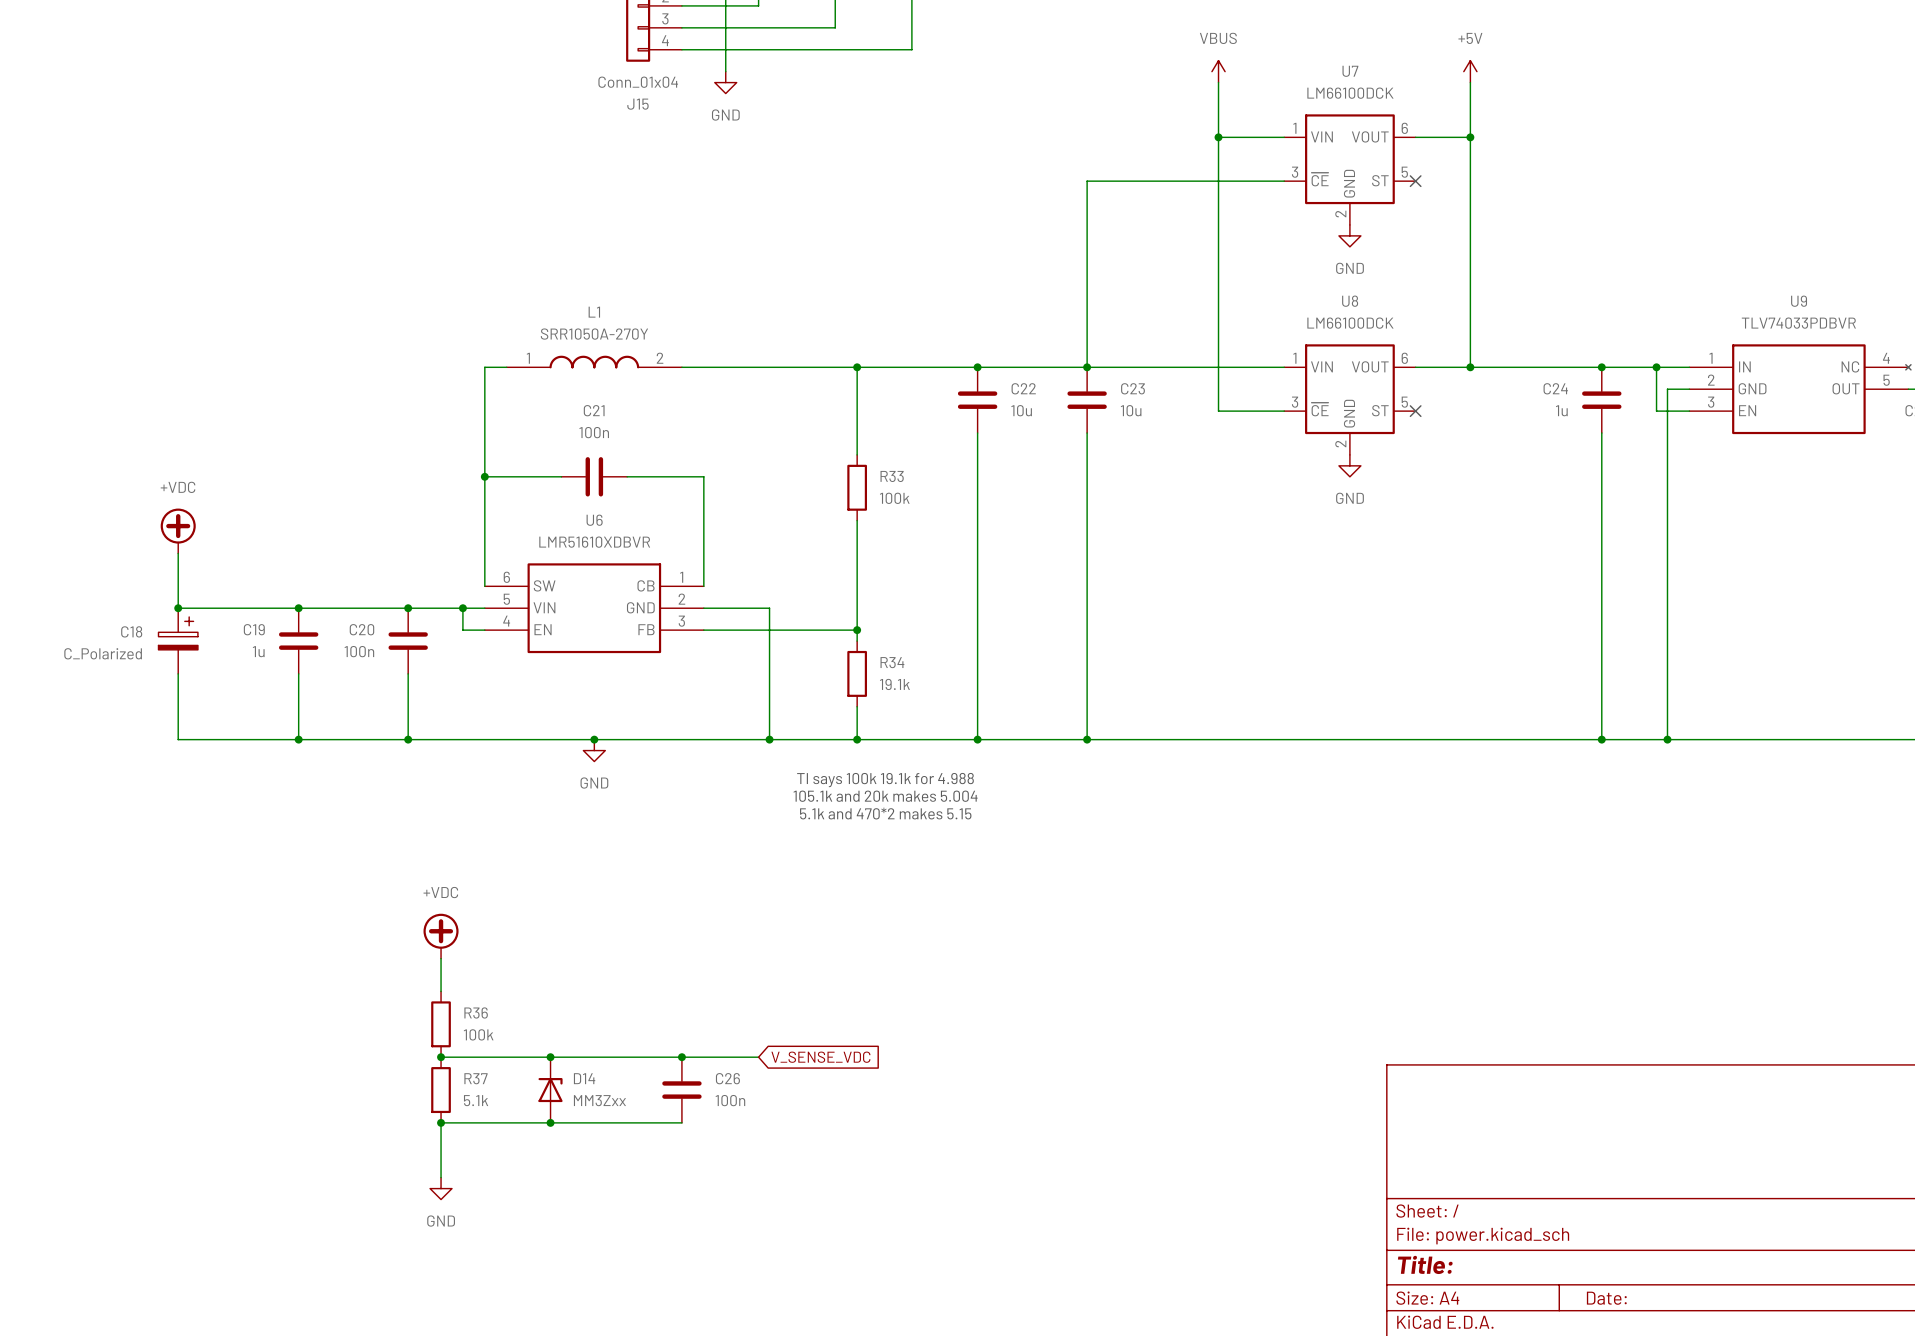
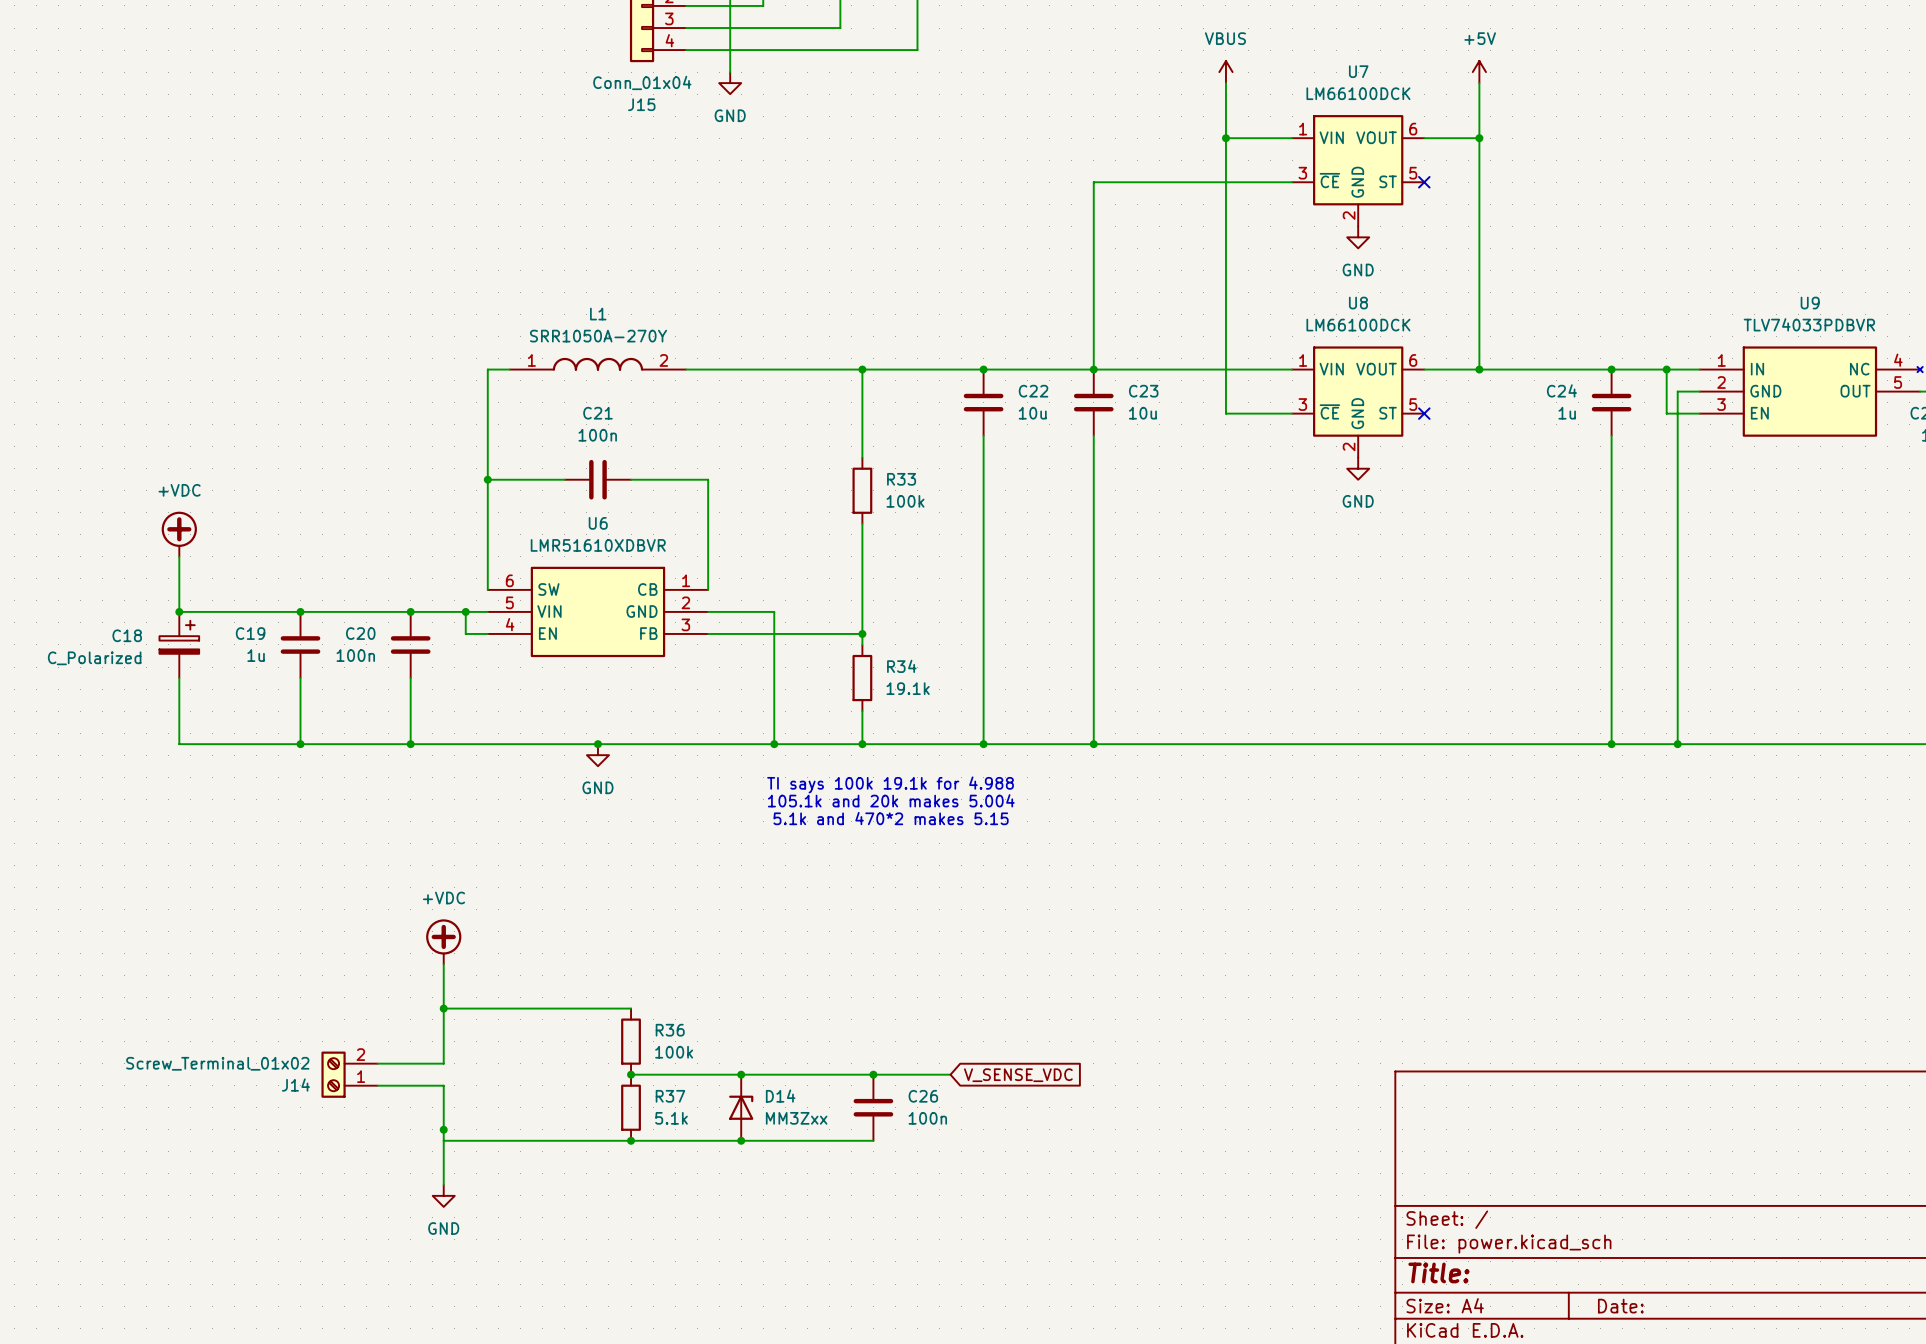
wire: none -> (443, 997) (443, 1063) (377, 1063)
wire: none -> (443, 1008) (631, 1008)
junction: none -> (443, 1008)
R36 position: (441, 1024) -> (631, 1041)
wire: (441, 1057) (758, 1057) -> (631, 1074) (950, 1074)
junction: (441, 1057) -> none
junction: (550, 1057) -> none
junction: (681, 1057) -> none
global label position: V_SENSE_VDC (820, 1057) -> V_SENSE_VDC (1018, 1075)
J14: none -> Screw_Terminal_01x02 (349, 1074)
junction: none -> (631, 1074)
junction: none -> (741, 1074)
junction: none -> (873, 1074)
R37 position: (441, 1090) -> (631, 1107)
D14 position: (550, 1090) -> (741, 1107)
C26 position: (681, 1090) -> (873, 1107)
wire: (441, 1122) (681, 1122) -> (443, 1129) (443, 1085) (377, 1085)
junction: (550, 1122) -> none
wire: none -> (443, 1140) (873, 1140)
junction: none -> (631, 1140)
junction: none -> (741, 1140)

